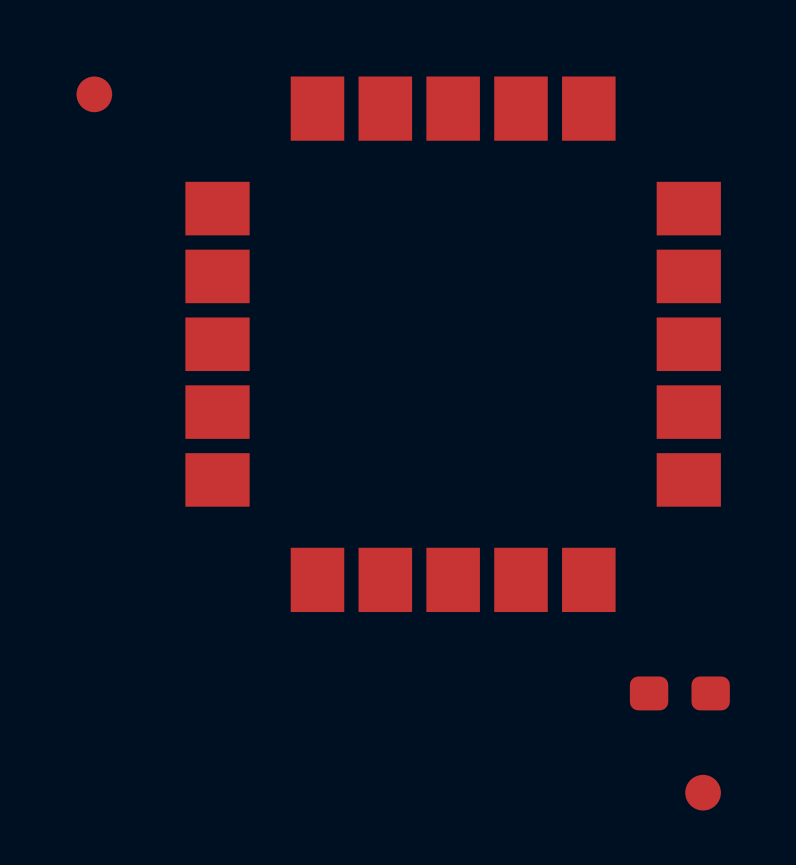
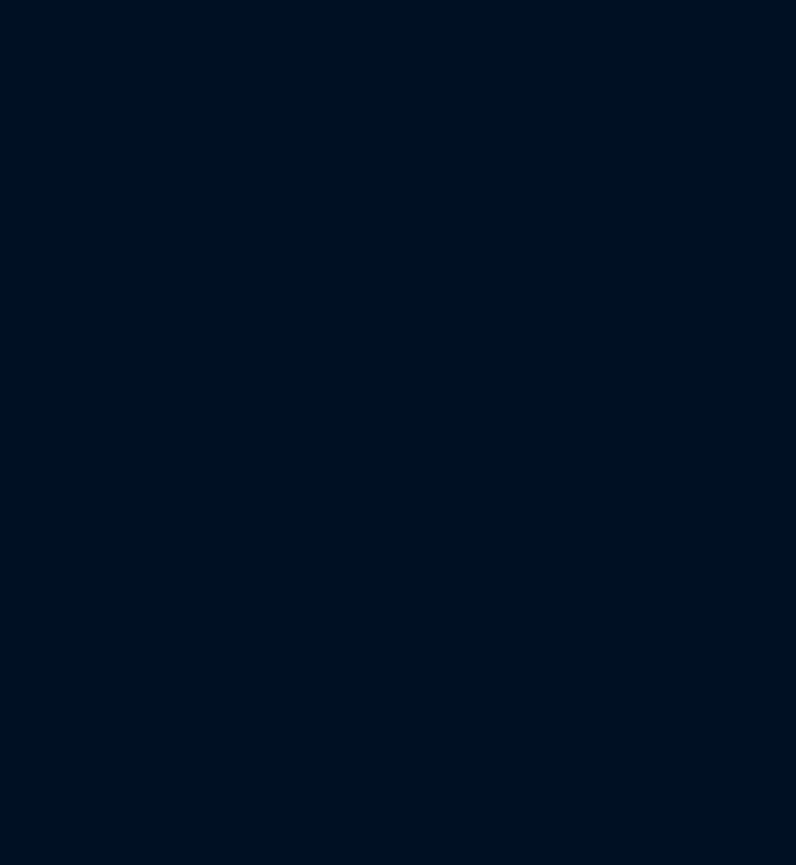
part: (94, 94) -> none
part: (453, 344) -> none
part: (679, 693) -> none
part: (703, 792) -> none

